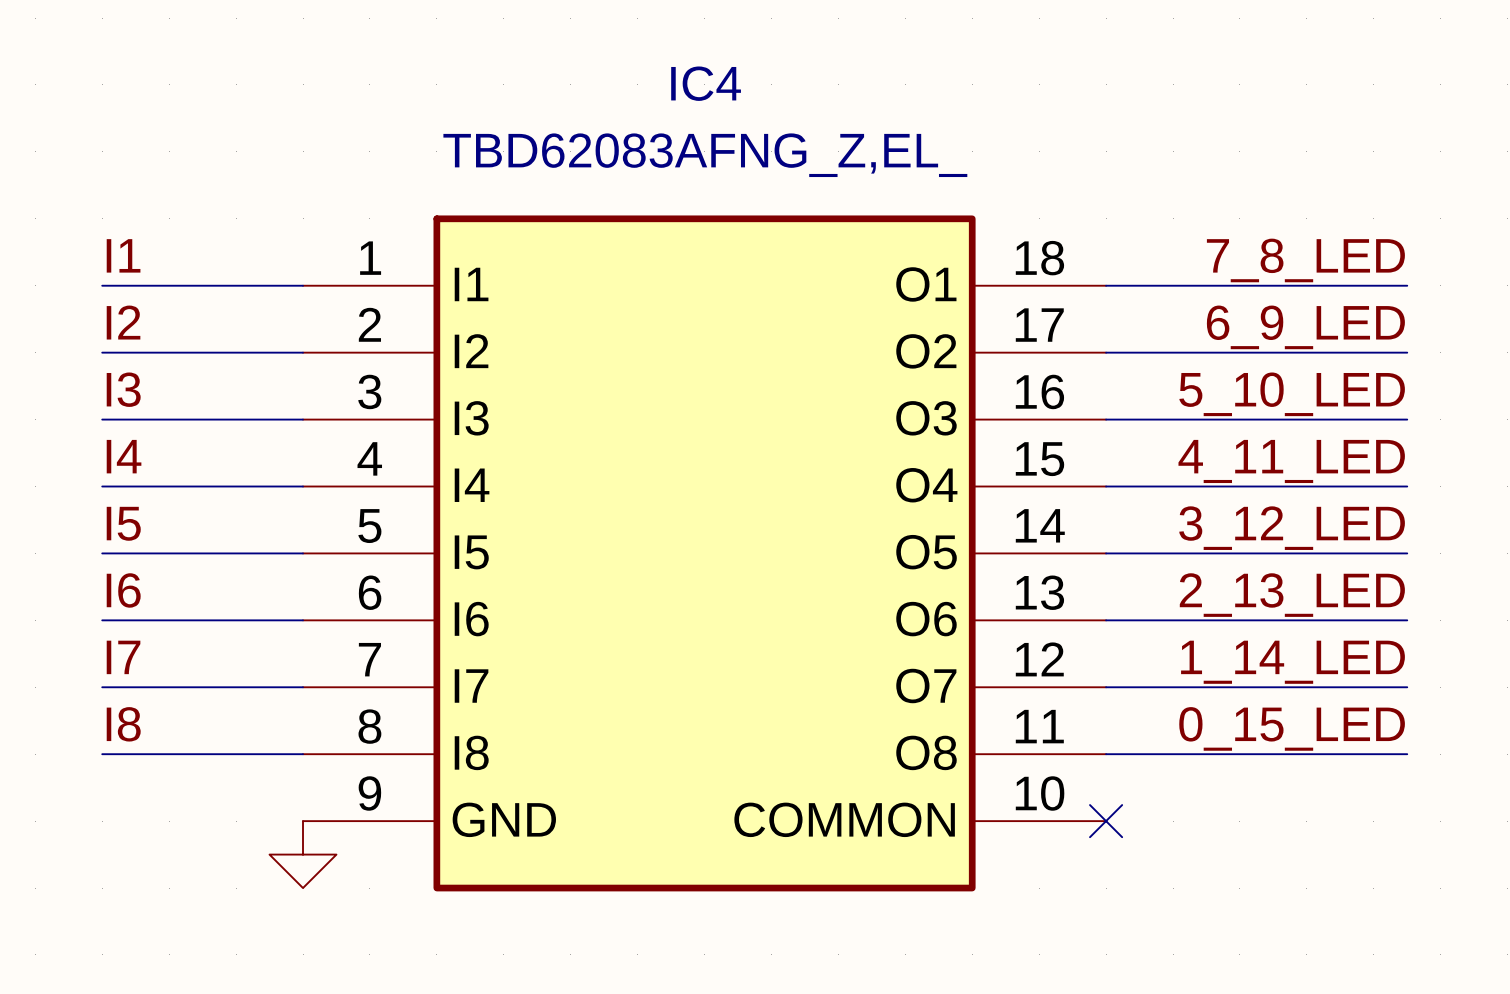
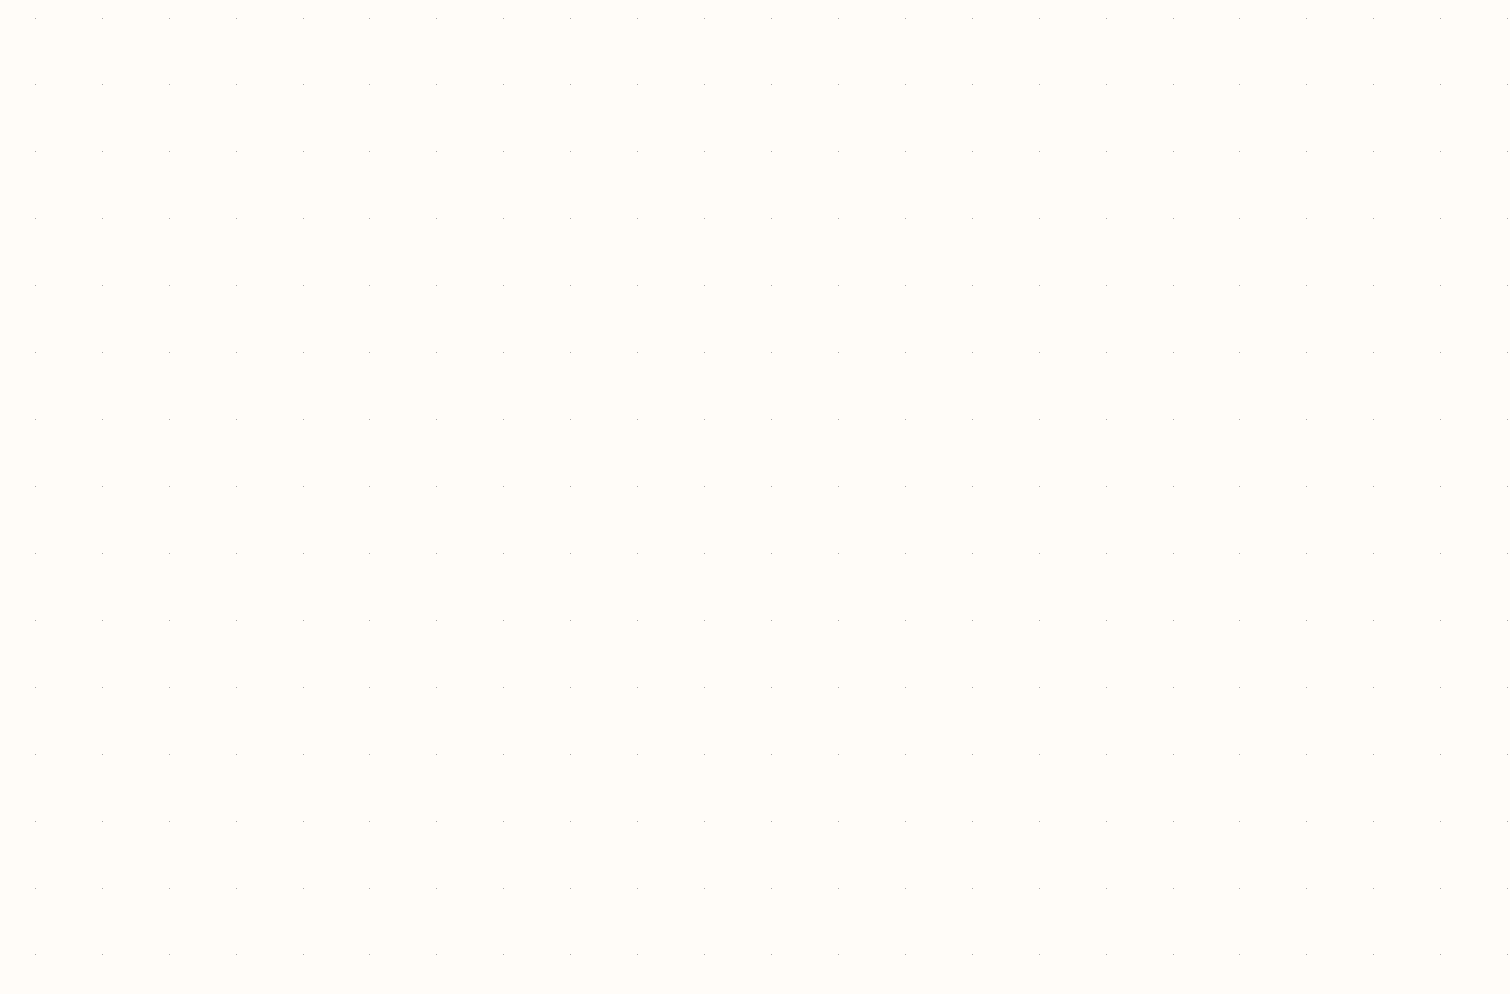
label: I1 (123, 255) -> none
label: 7_8_LED (1305, 260) -> none
wire: (102, 285) (303, 285) -> none
wire: (1106, 285) (1407, 285) -> none
label: I2 (123, 322) -> none
label: 6_9_LED (1305, 327) -> none
wire: (102, 352) (303, 352) -> none
wire: (1106, 352) (1407, 352) -> none
label: I3 (123, 389) -> none
label: 5_10_LED (1292, 394) -> none
wire: (102, 419) (303, 419) -> none
wire: (1106, 419) (1407, 419) -> none
label: I4 (124, 456) -> none
label: 4_11_LED (1291, 461) -> none
wire: (102, 486) (303, 486) -> none
wire: (1106, 486) (1407, 486) -> none
label: I5 (123, 523) -> none
label: 3_12_LED (1292, 528) -> none
wire: (102, 553) (303, 553) -> none
IC4: TBD62083AFNG_Z,EL_ (704, 553) -> none
wire: (1106, 553) (1407, 553) -> none
label: I6 (123, 590) -> none
label: 2_13_LED (1292, 595) -> none
wire: (102, 620) (303, 620) -> none
wire: (1106, 620) (1407, 620) -> none
label: I7 (123, 657) -> none
label: 1_14_LED (1292, 662) -> none
wire: (102, 687) (303, 687) -> none
wire: (1106, 687) (1407, 687) -> none
label: I8 (123, 724) -> none
label: 0_15_LED (1292, 728) -> none
wire: (102, 754) (303, 754) -> none
wire: (1106, 754) (1407, 754) -> none
no-connect mark: (1106, 821) -> none
power symbol: (303, 854) -> none

